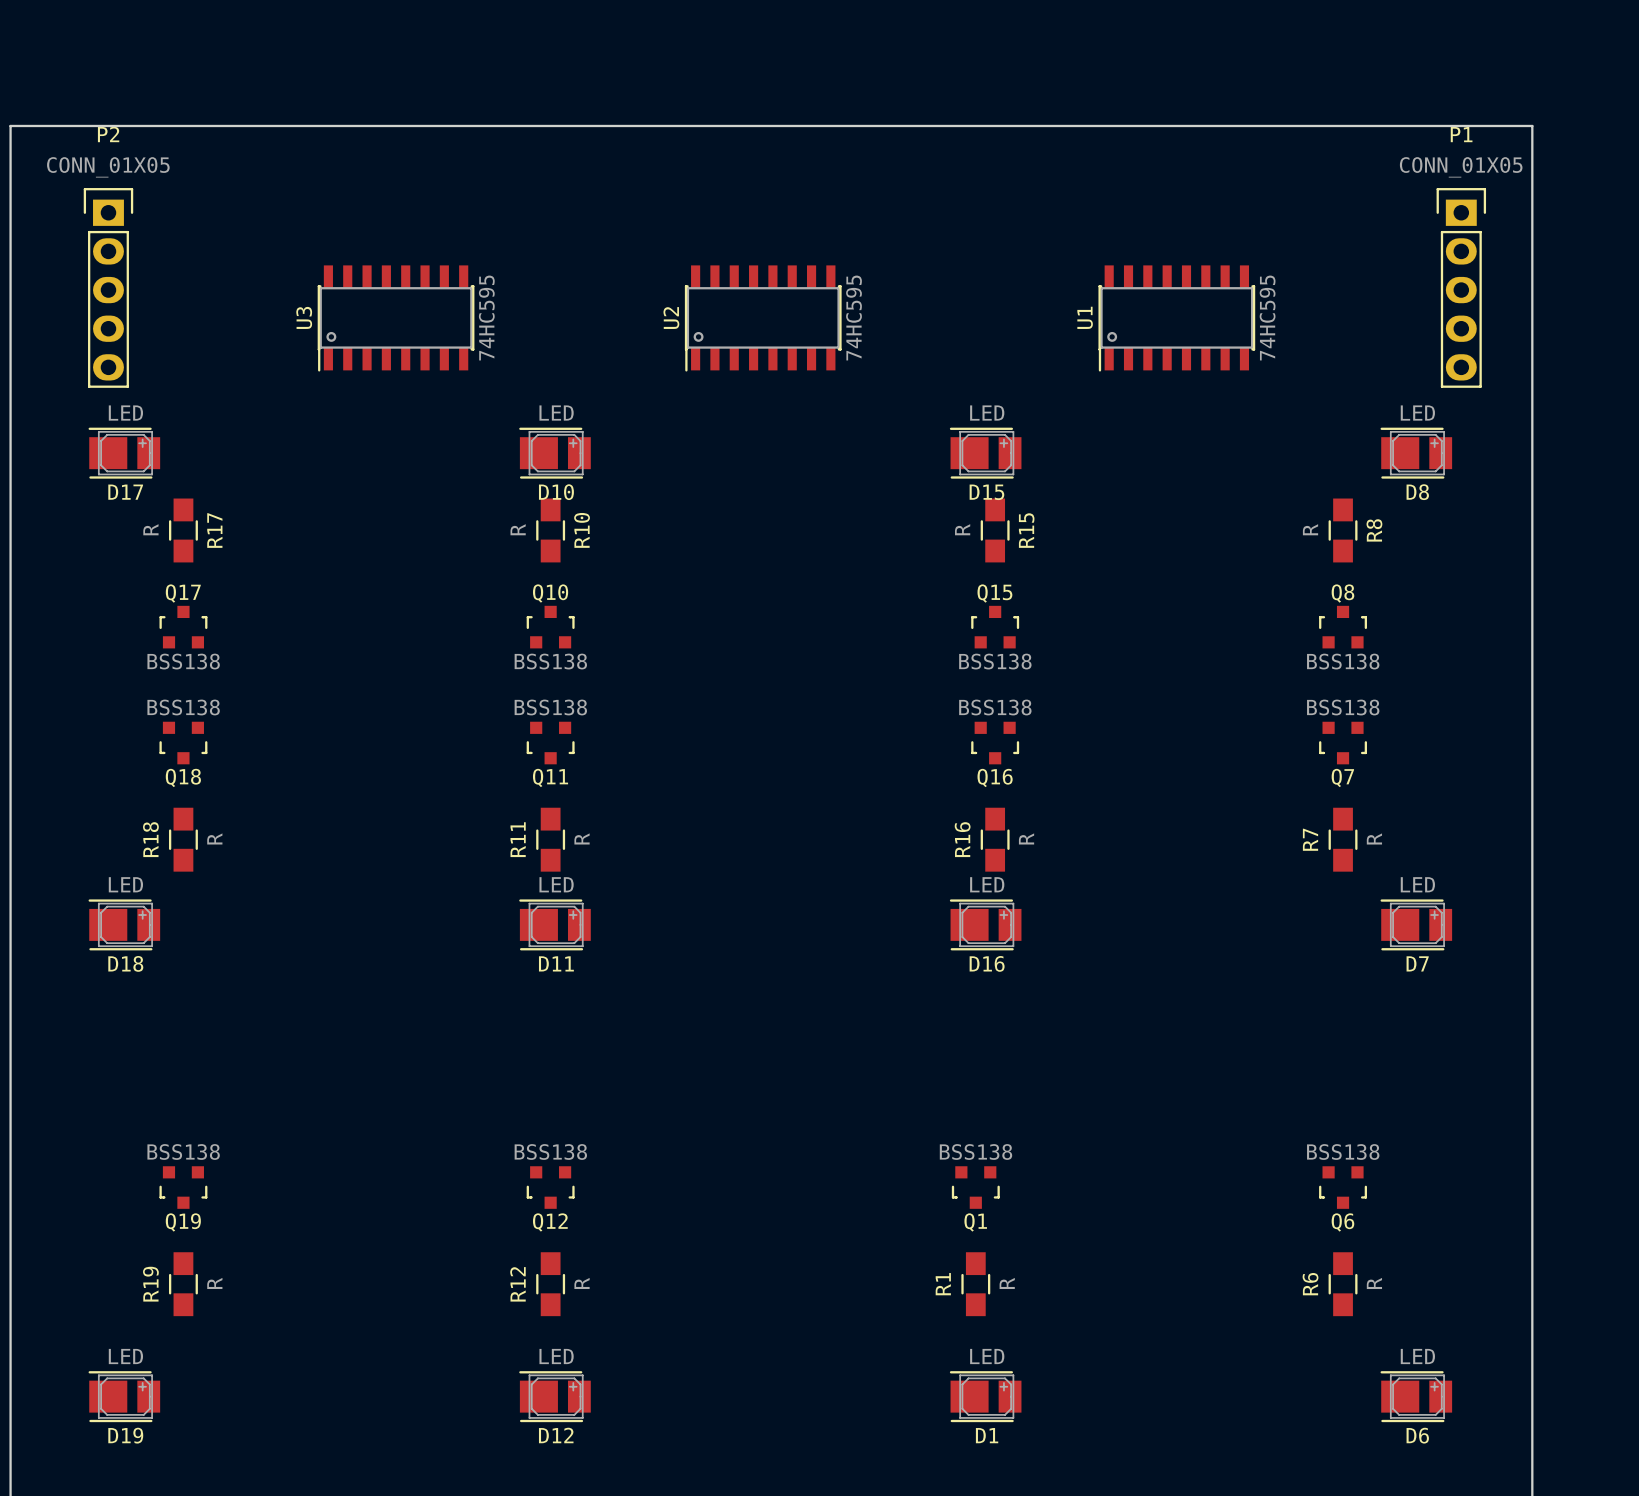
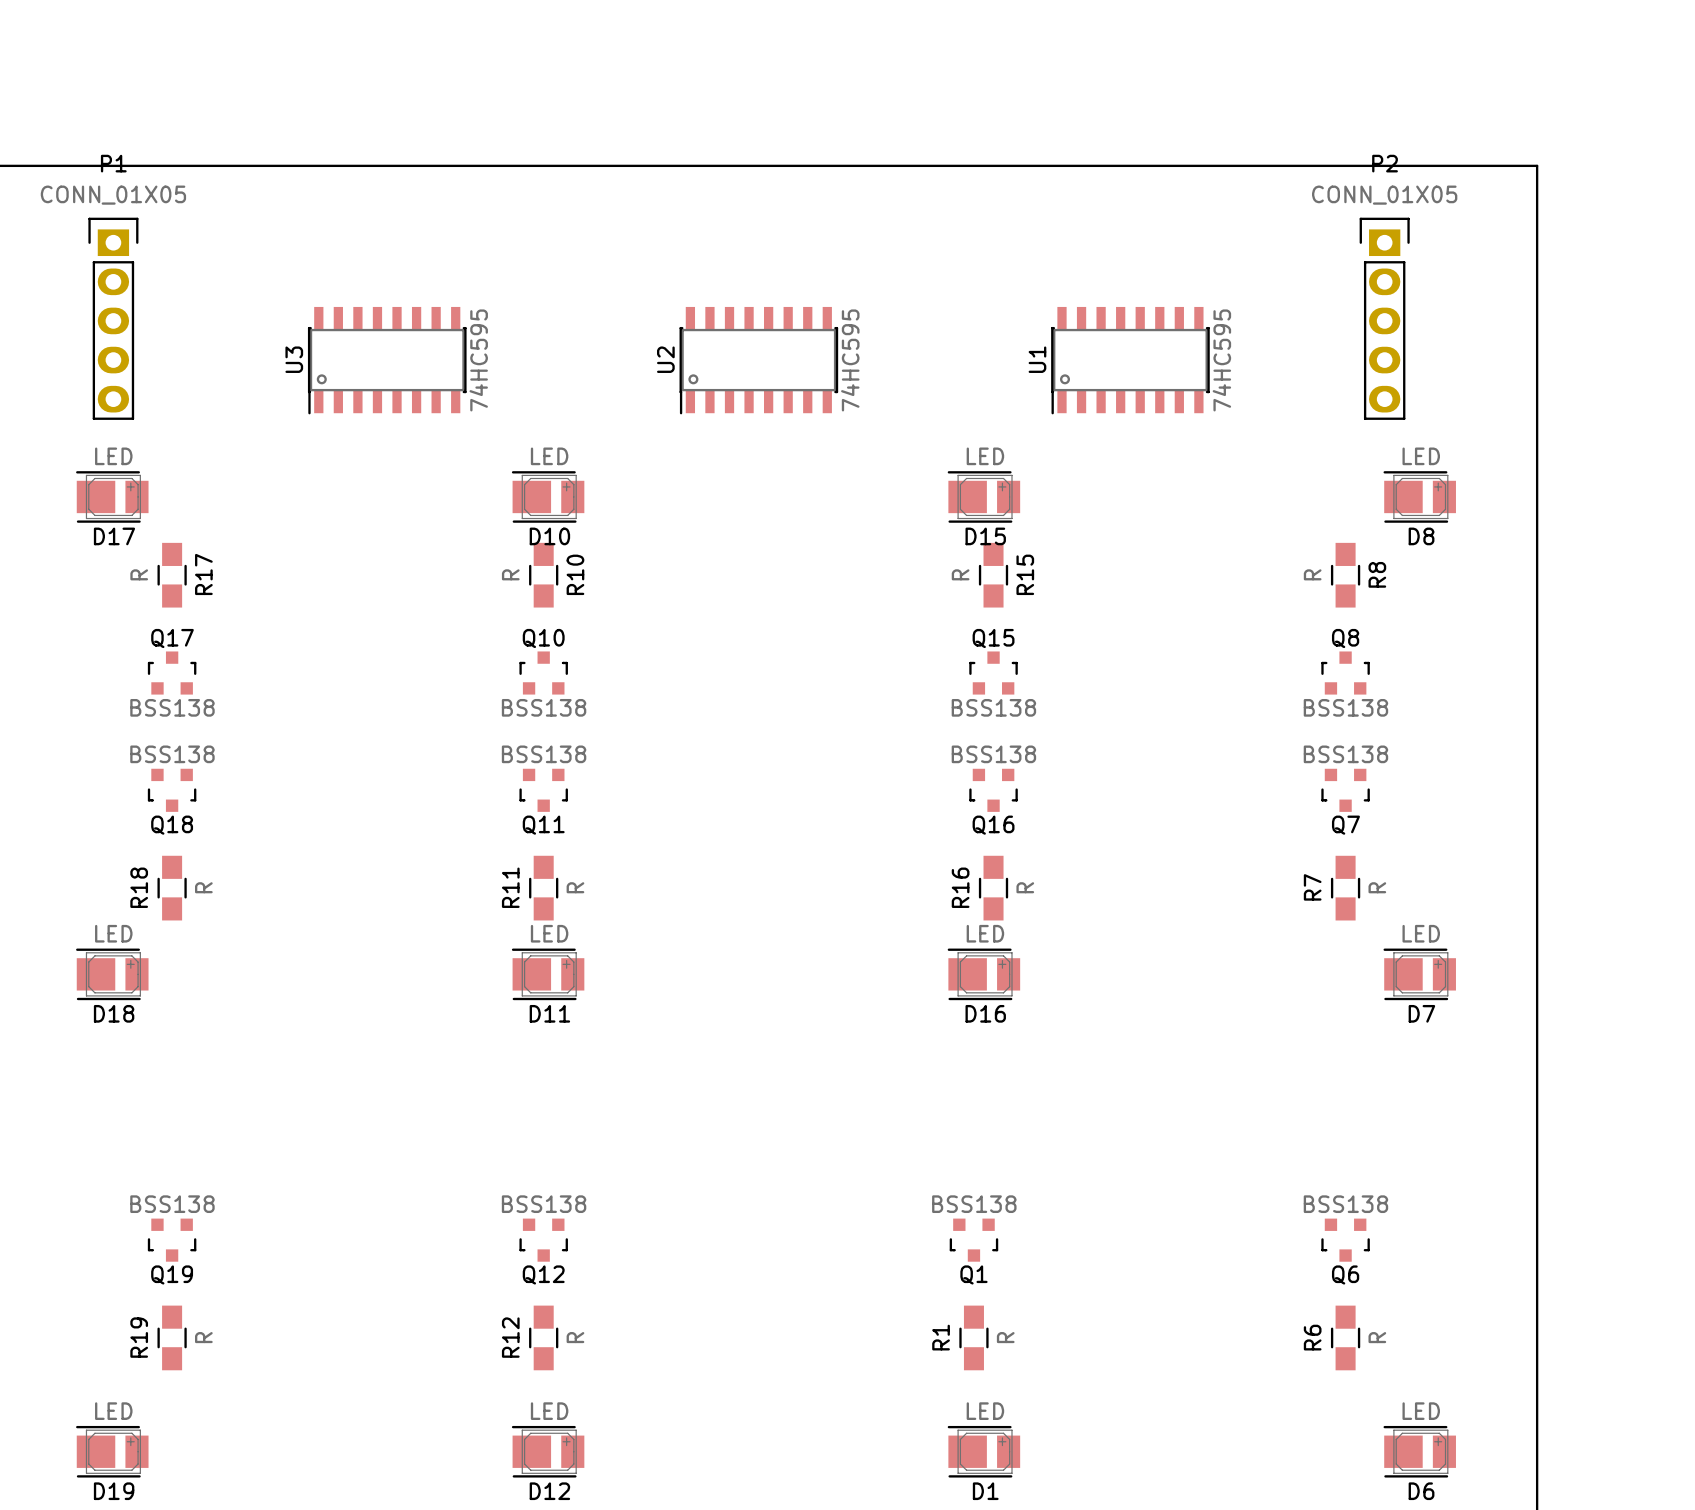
P2 position: (108, 287) -> (1384, 318)
P1 position: (1461, 287) -> (113, 318)
U1 position: (1176, 318) -> (1130, 360)

